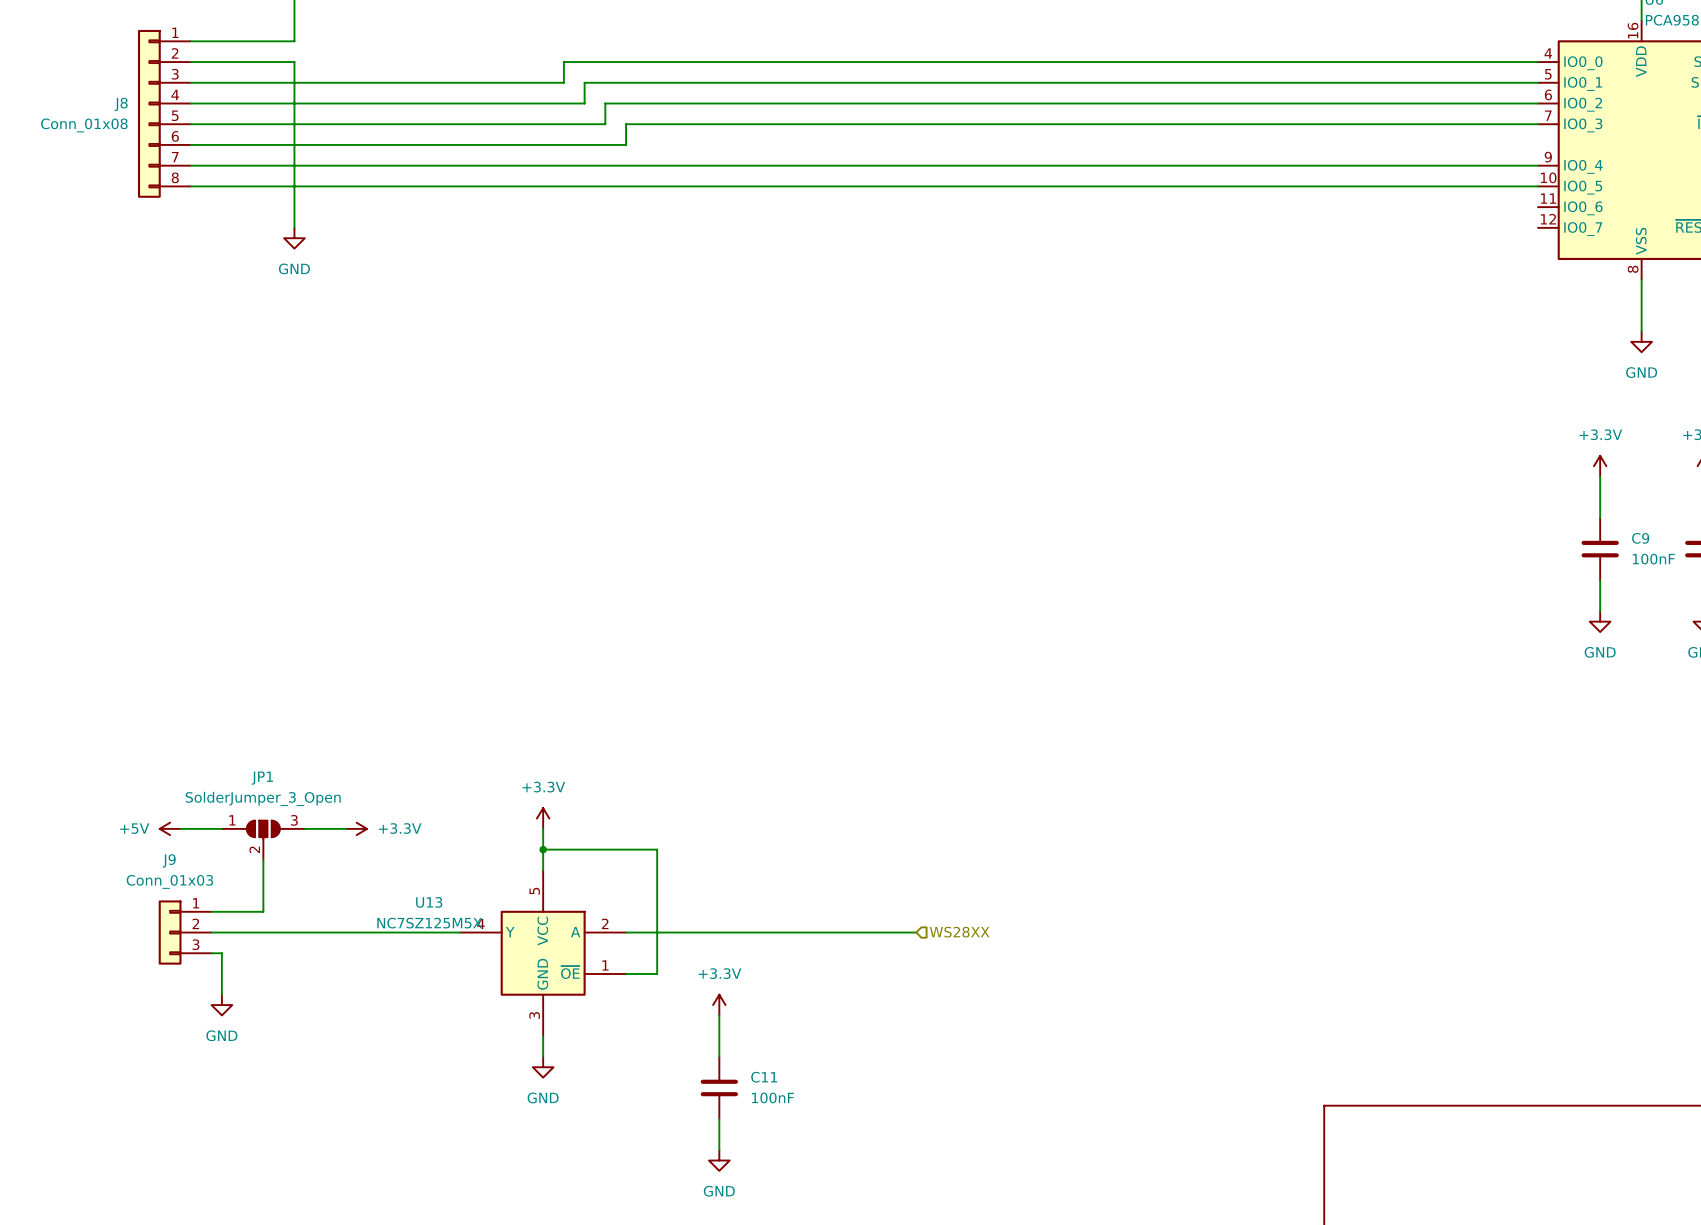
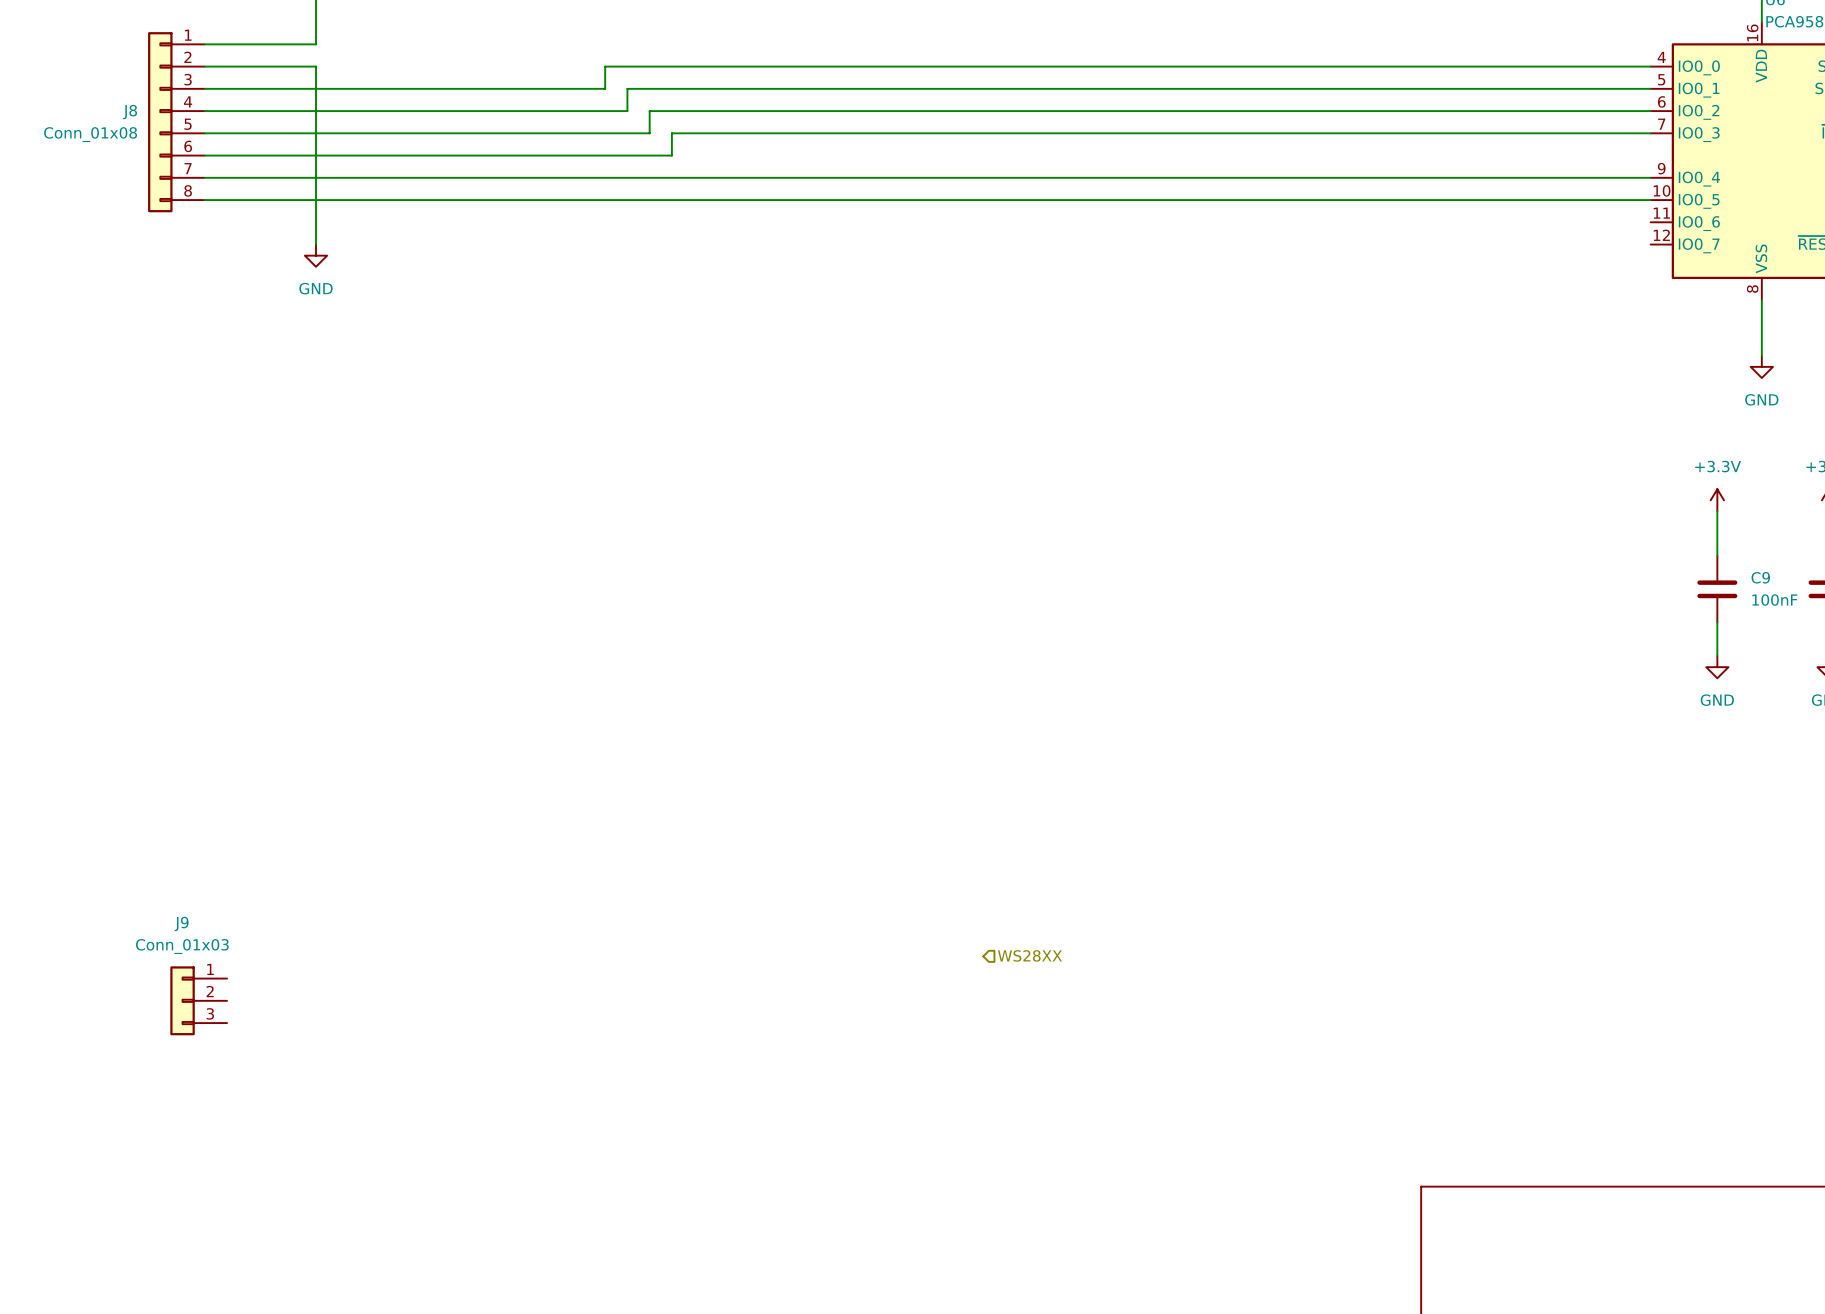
power symbol: +3.3V (543, 818) -> none
power symbol: +5V (170, 828) -> none
wire: (180, 828) (221, 828) -> none
wire: (304, 828) (346, 828) -> none
power symbol: +3.3V (356, 828) -> none
wire: (543, 828) (543, 870) -> none
JP1: SolderJumper_3_Open (263, 840) -> none
wire: (543, 849) (657, 849) (657, 973) (626, 973) -> none
junction: (543, 849) -> none
wire: (263, 859) (263, 911) (211, 911) -> none
wire: (211, 932) (460, 932) -> none
wire: (626, 932) (916, 932) -> none
hierarchical label position: WS28XX (959, 932) -> WS28XX (1029, 955)
wire: (211, 953) (221, 953) (221, 994) -> none
U13: NC7SZ125M5X (543, 953) -> none
power symbol: GND (221, 1005) -> none
power symbol: +3.3V (719, 1005) -> none
wire: (719, 1015) (719, 1056) -> none
wire: (543, 1036) (543, 1056) -> none
power symbol: GND (543, 1067) -> none
C11: 100nF (719, 1087) -> none
wire: (719, 1119) (719, 1150) -> none
power symbol: GND (719, 1160) -> none

